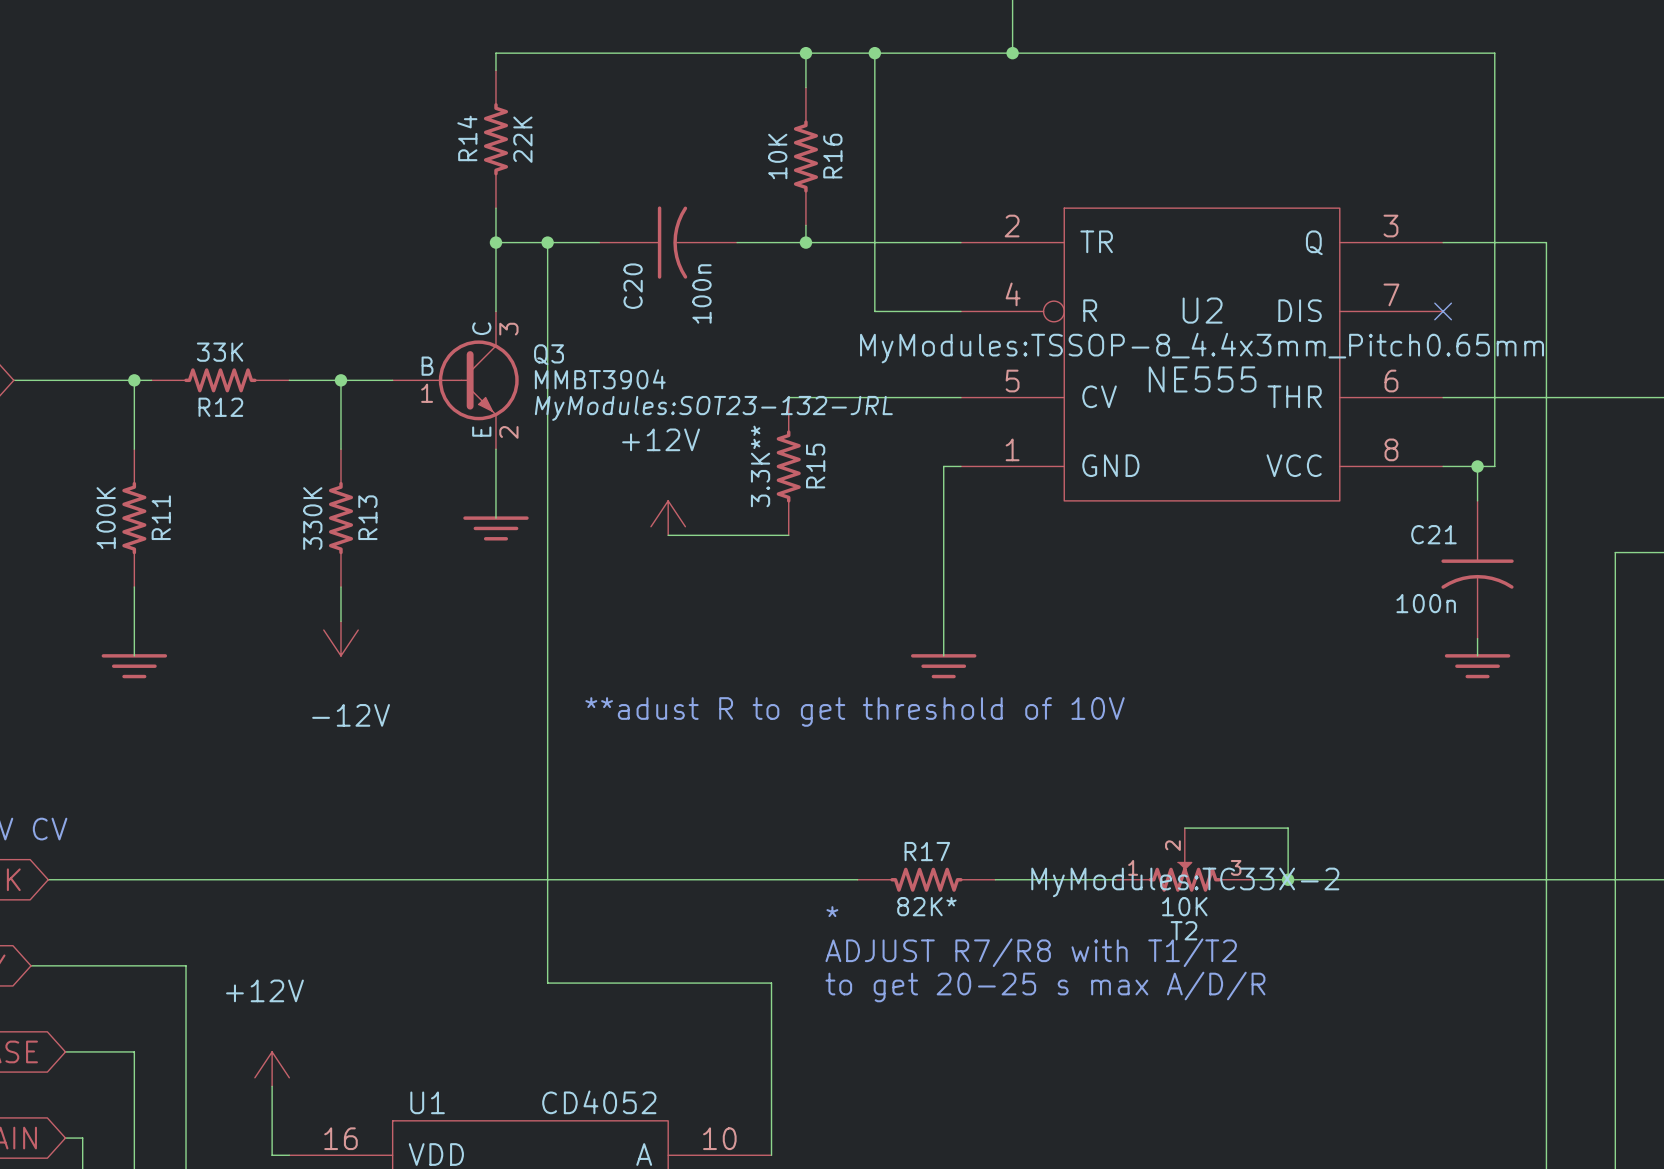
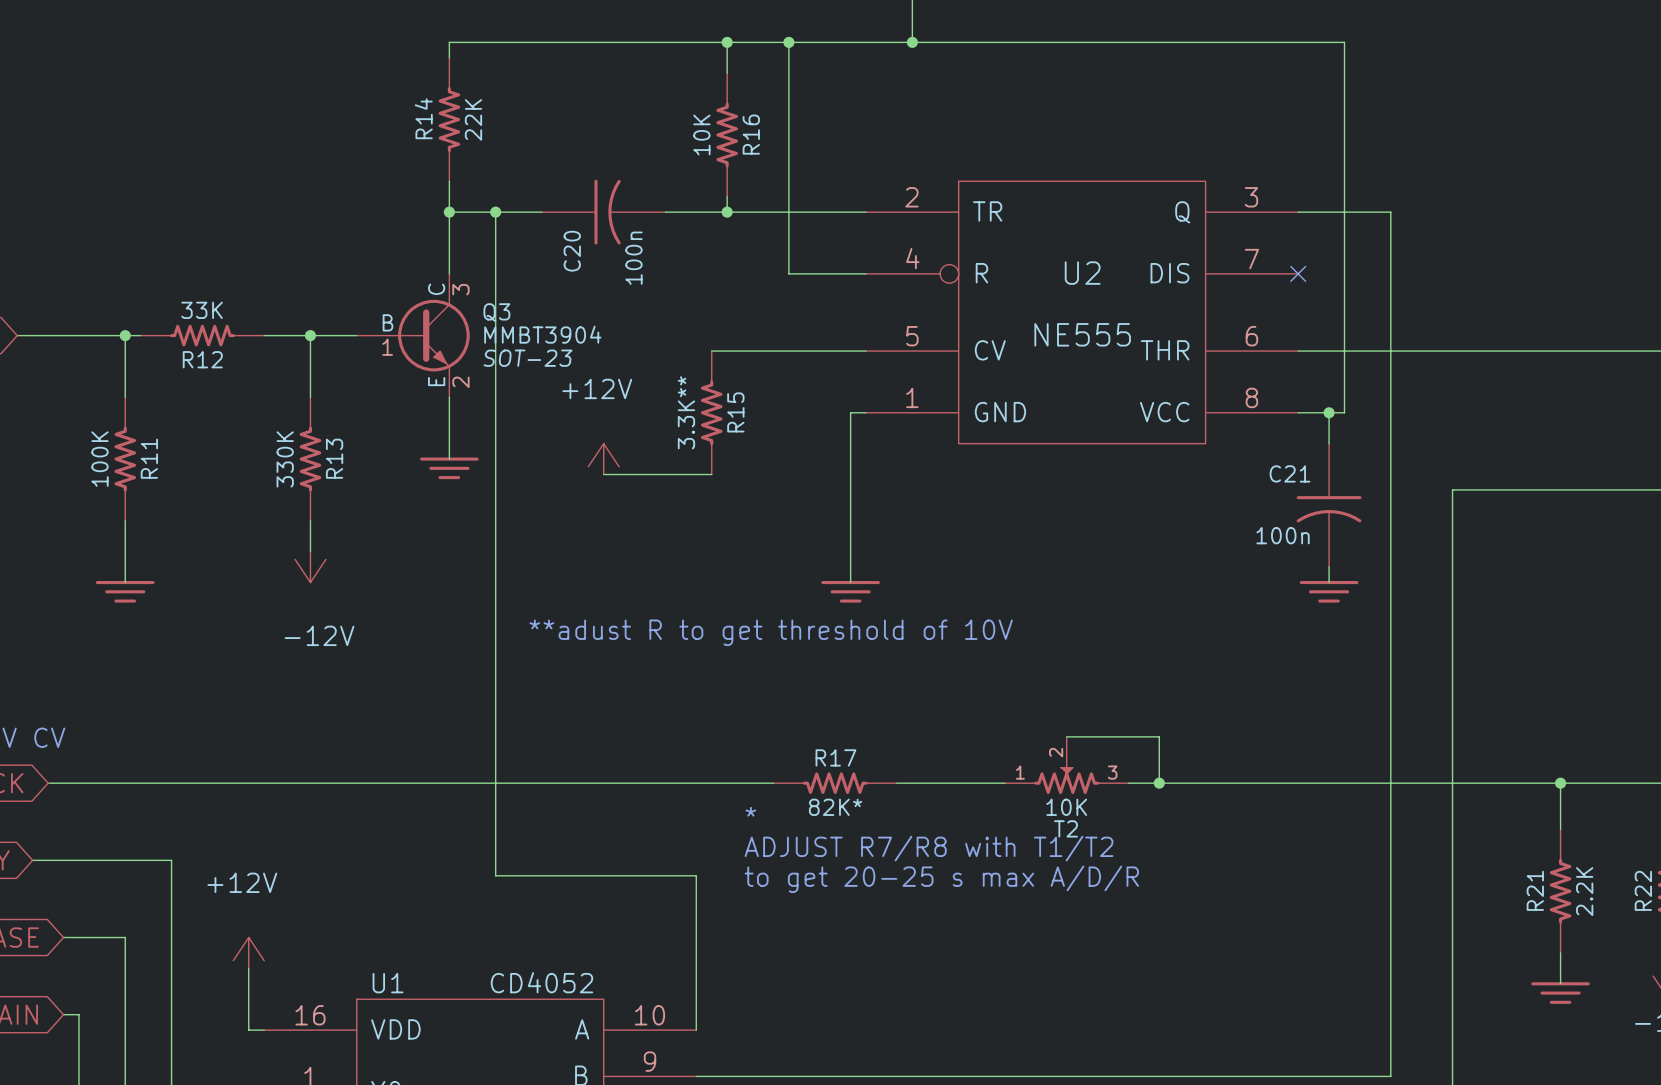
U2 text: MyModules:TSSOP-8_4.4x3mm_Pitch0.65mm (1202, 348) -> none
Q3 text: MyModules:SOT23-132-JRL (713, 408) -> SOT-23 (528, 358)
T2 text: MyModules:TC33X-2 (1185, 882) -> none

